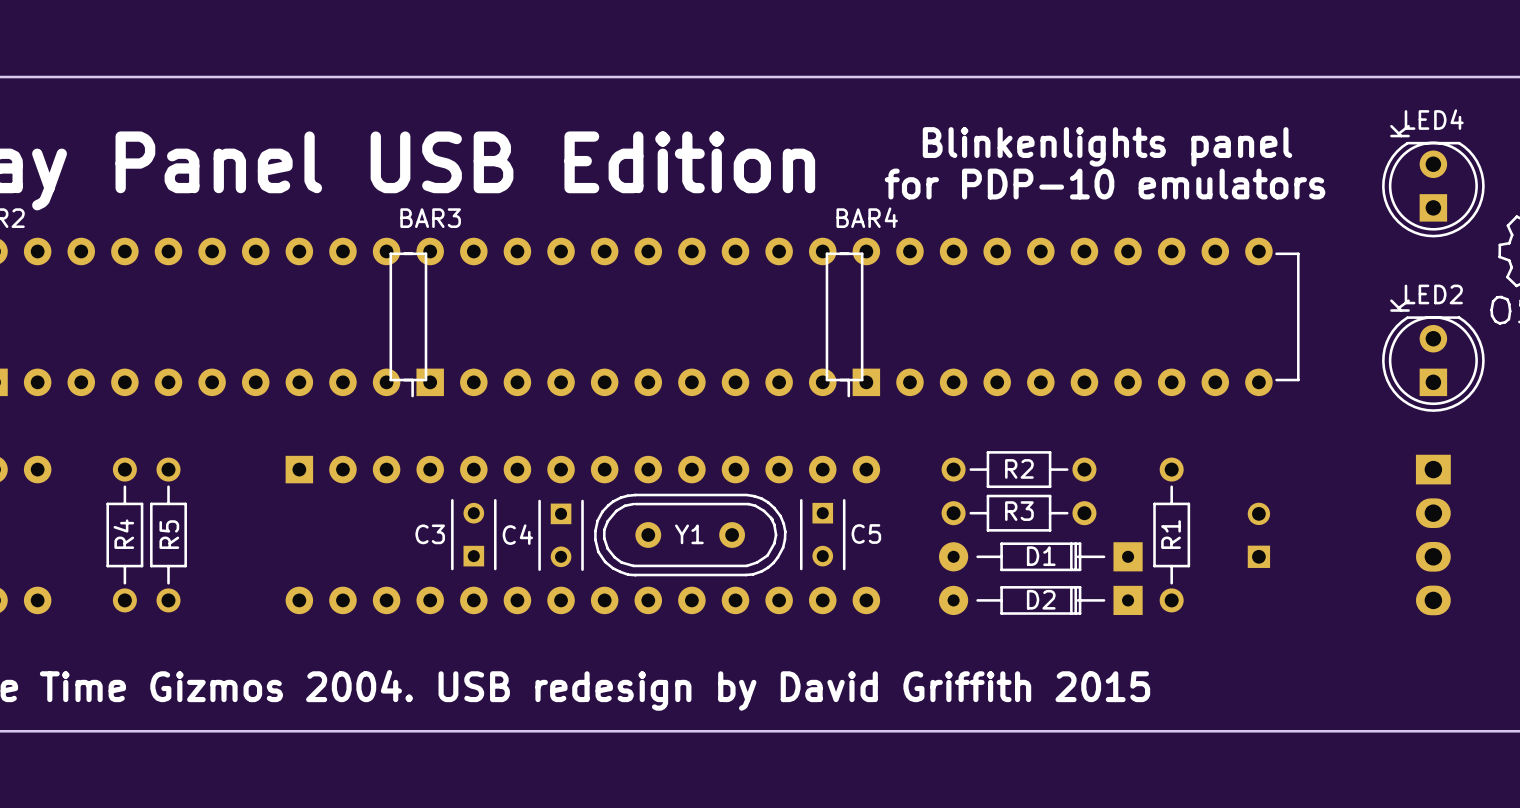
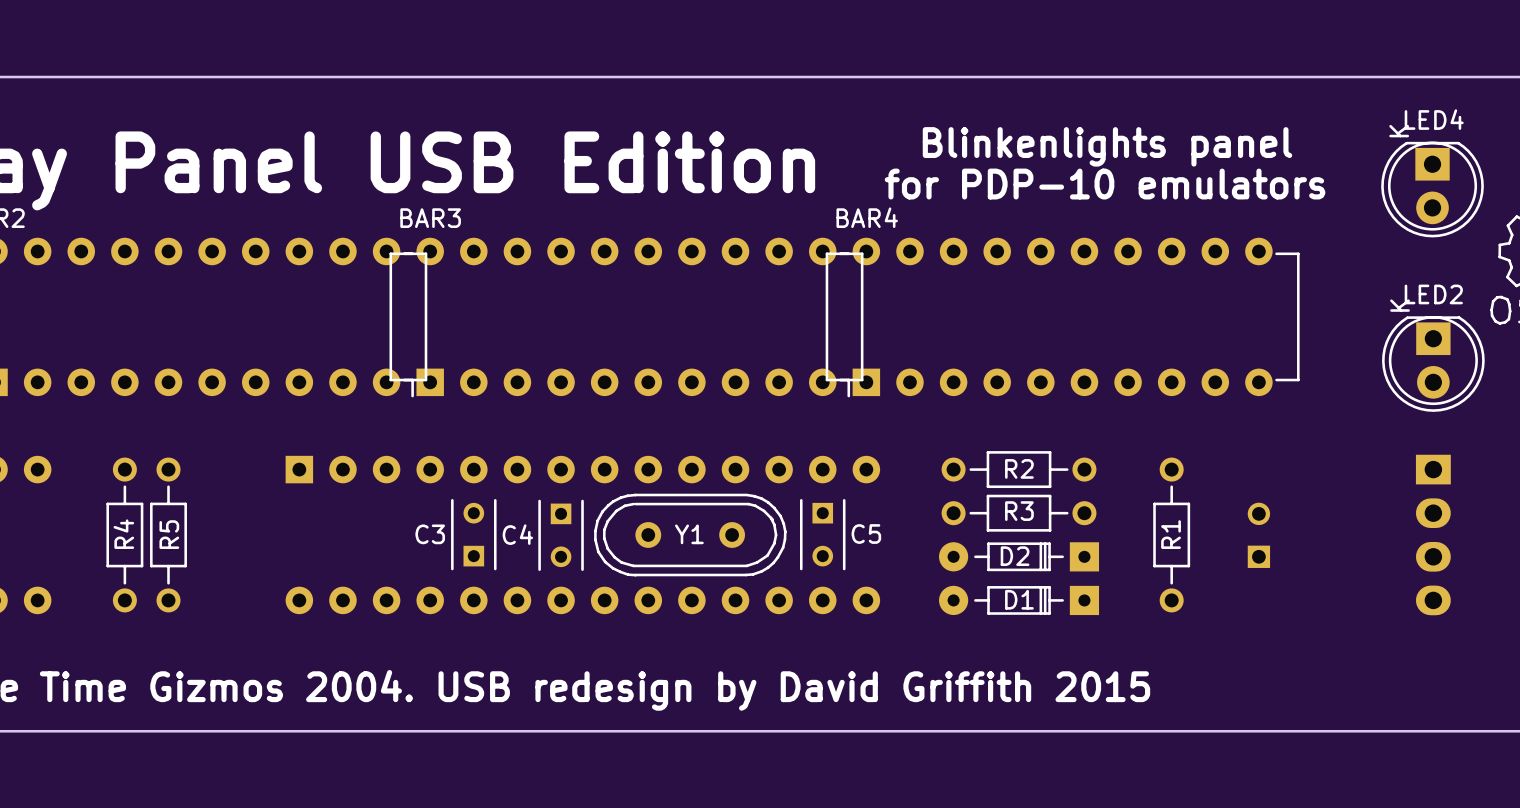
LED4 footprint: [1382, 141, 1485, 238] -> [1381, 141, 1484, 238]
LED2 footprint: [1382, 316, 1485, 412] -> [1382, 316, 1485, 412]
D1 footprint: [939, 542, 1143, 572] -> [939, 585, 1100, 616]
D2 footprint: [939, 585, 1143, 616] -> [939, 542, 1100, 572]

